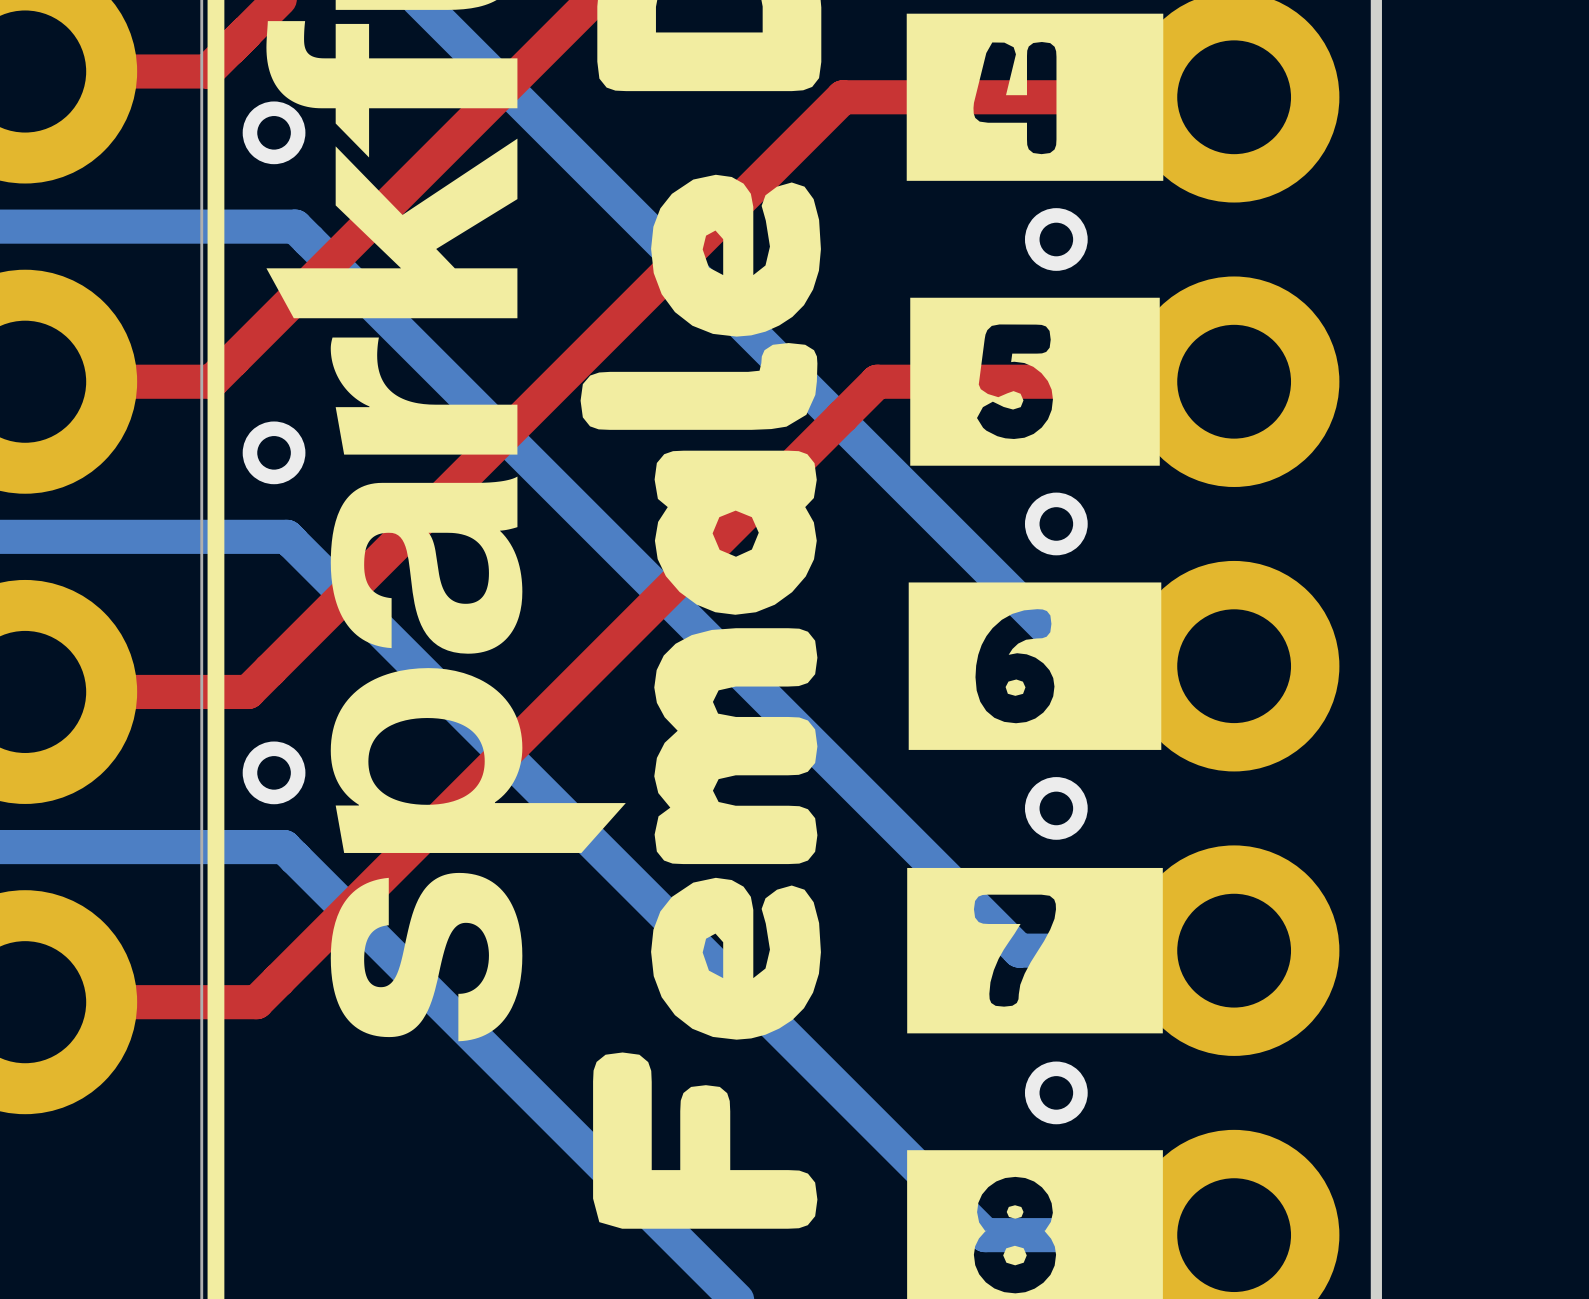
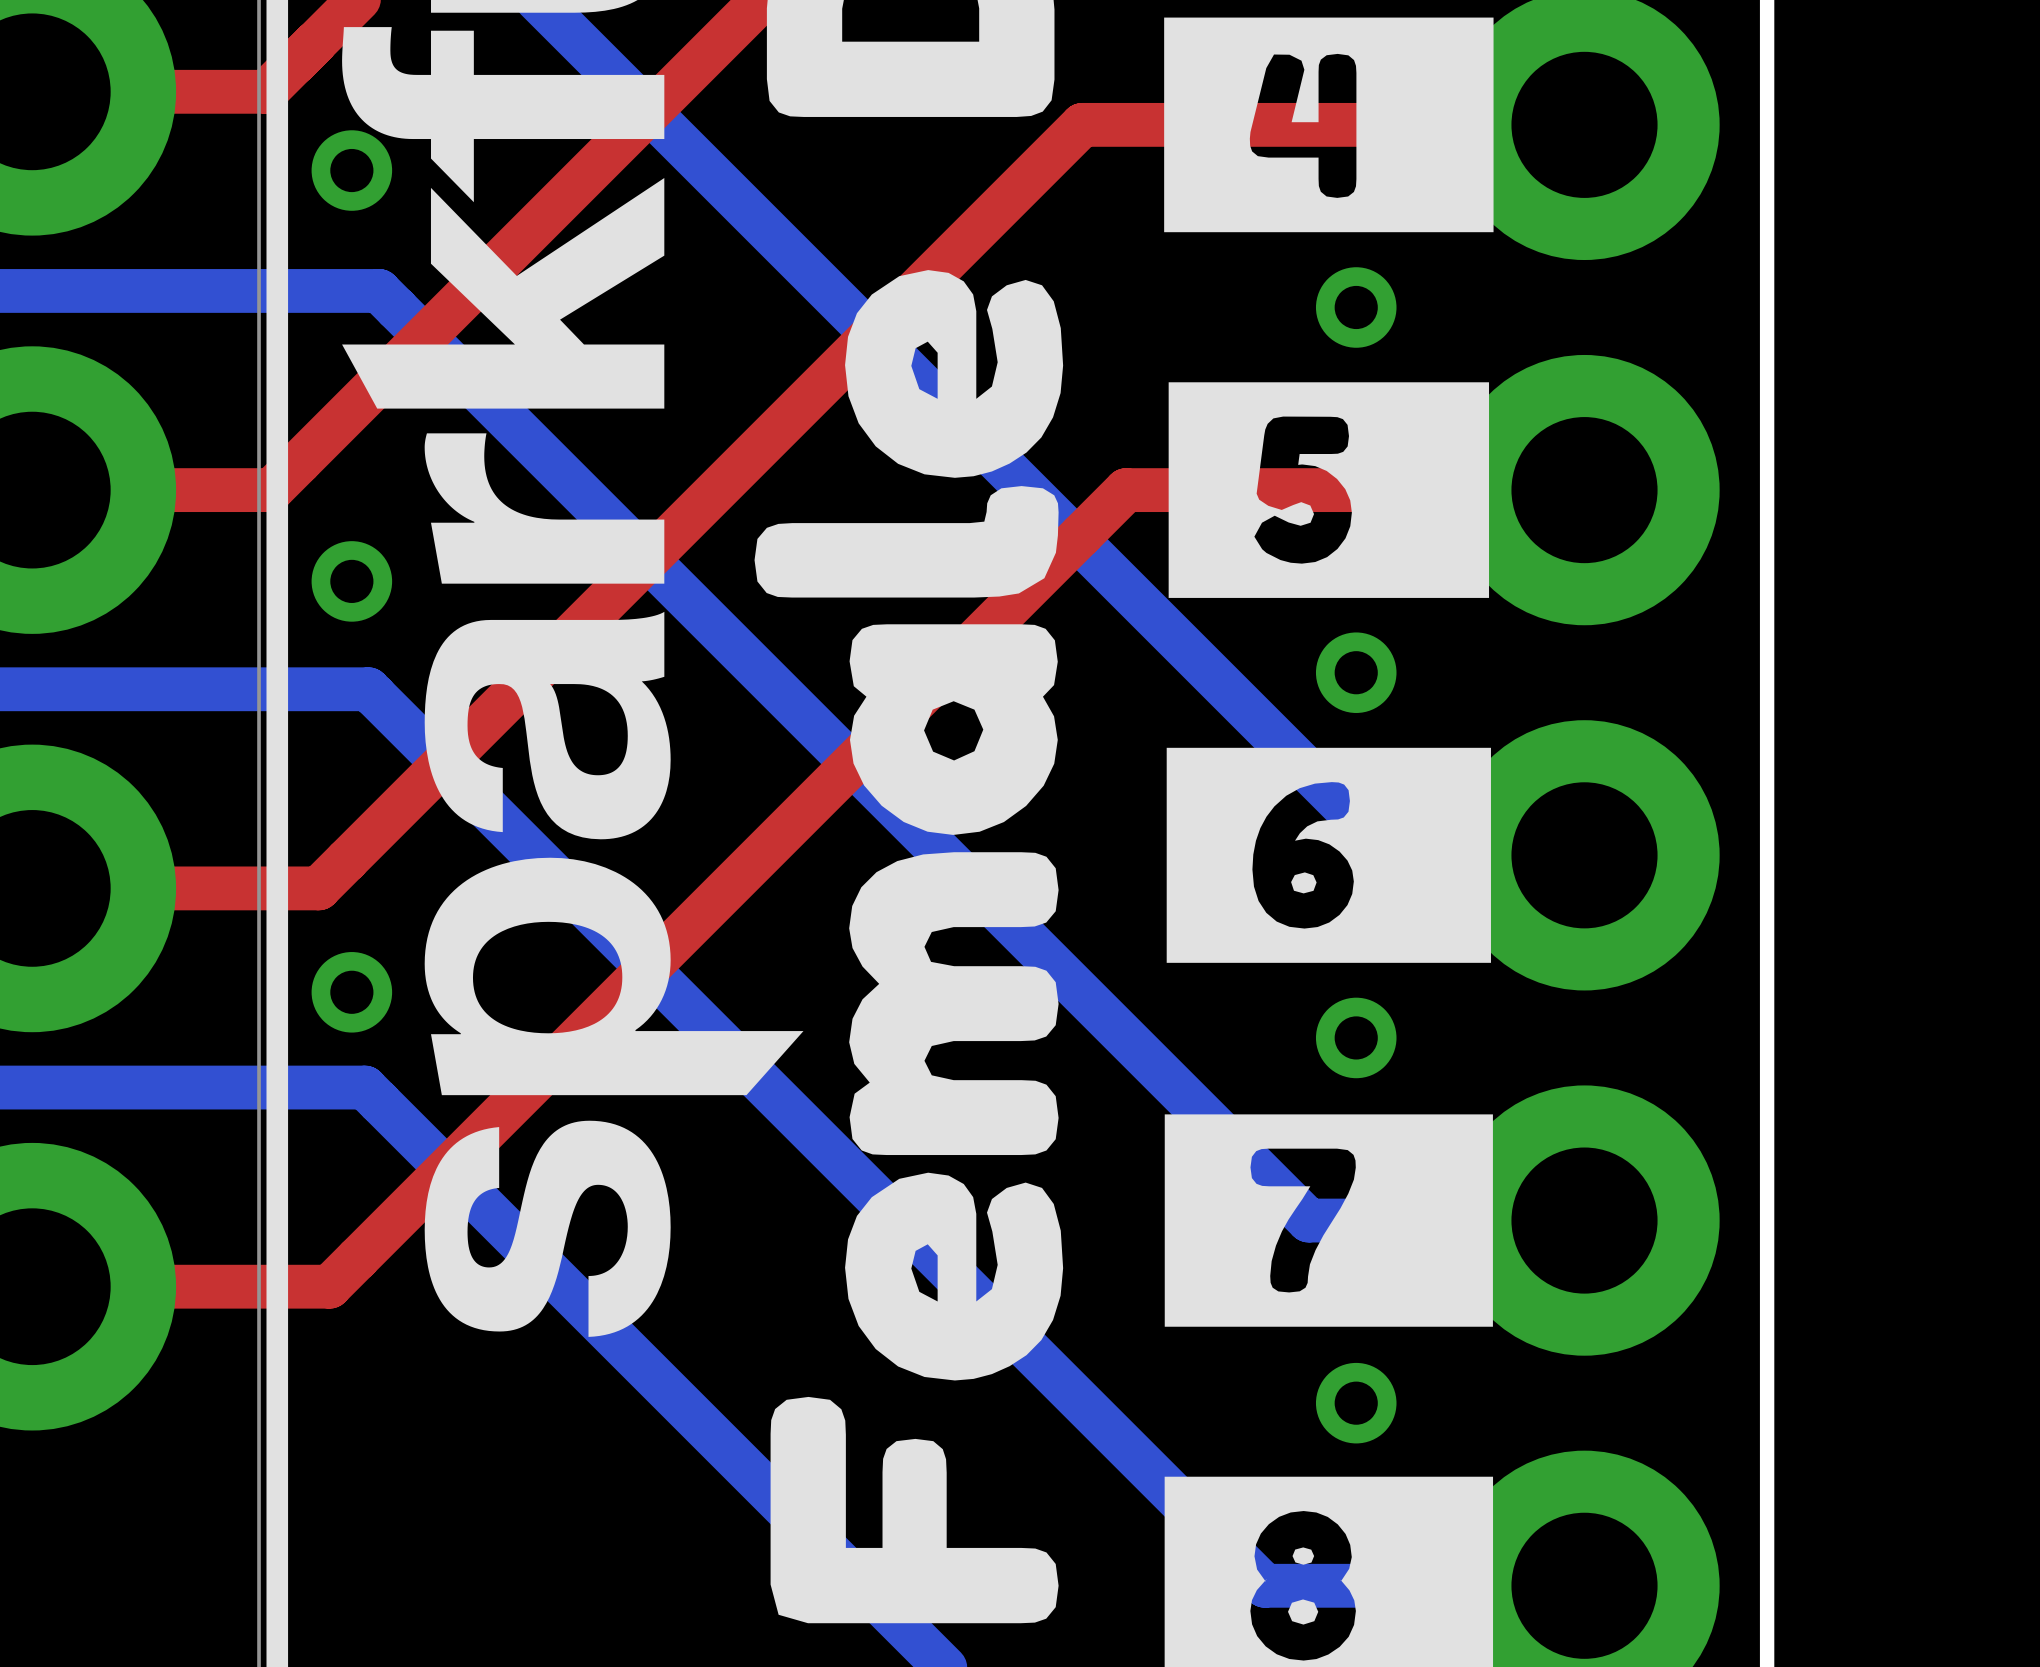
drawing position: (700, 701) -> (908, 946)

